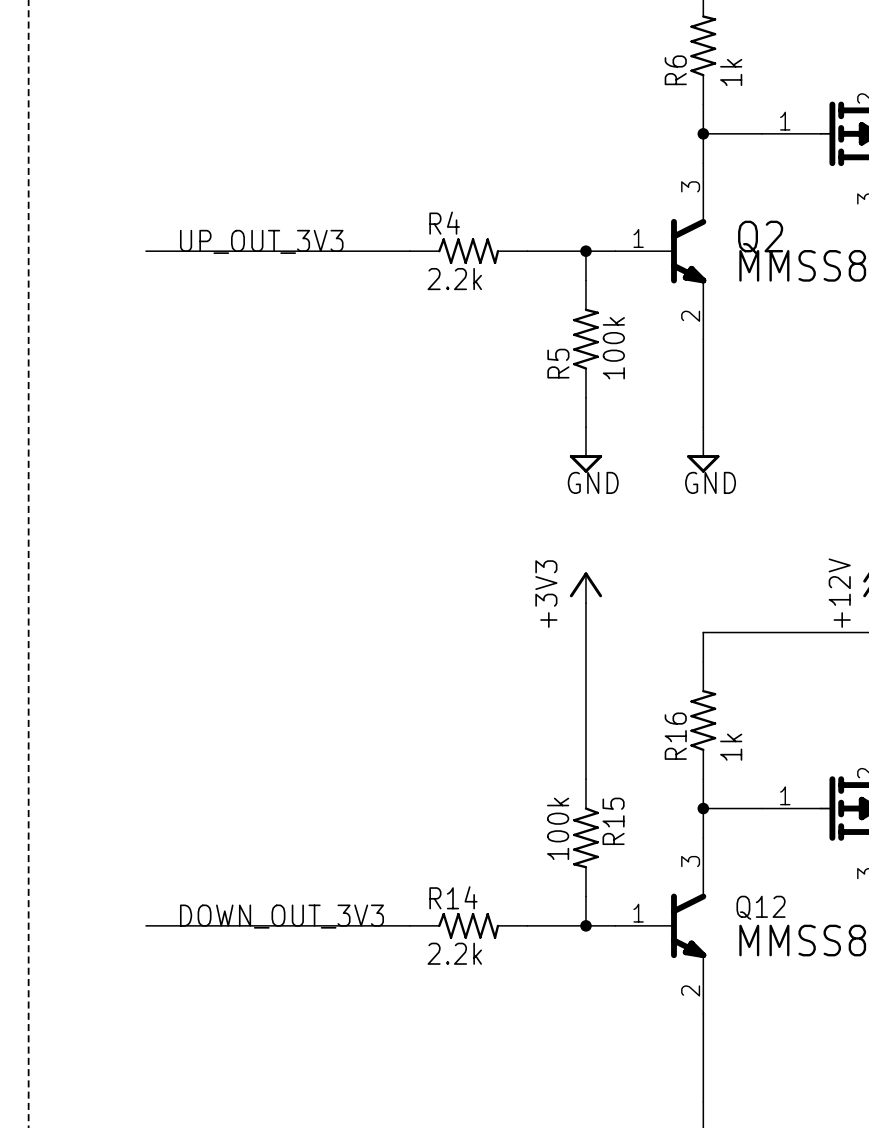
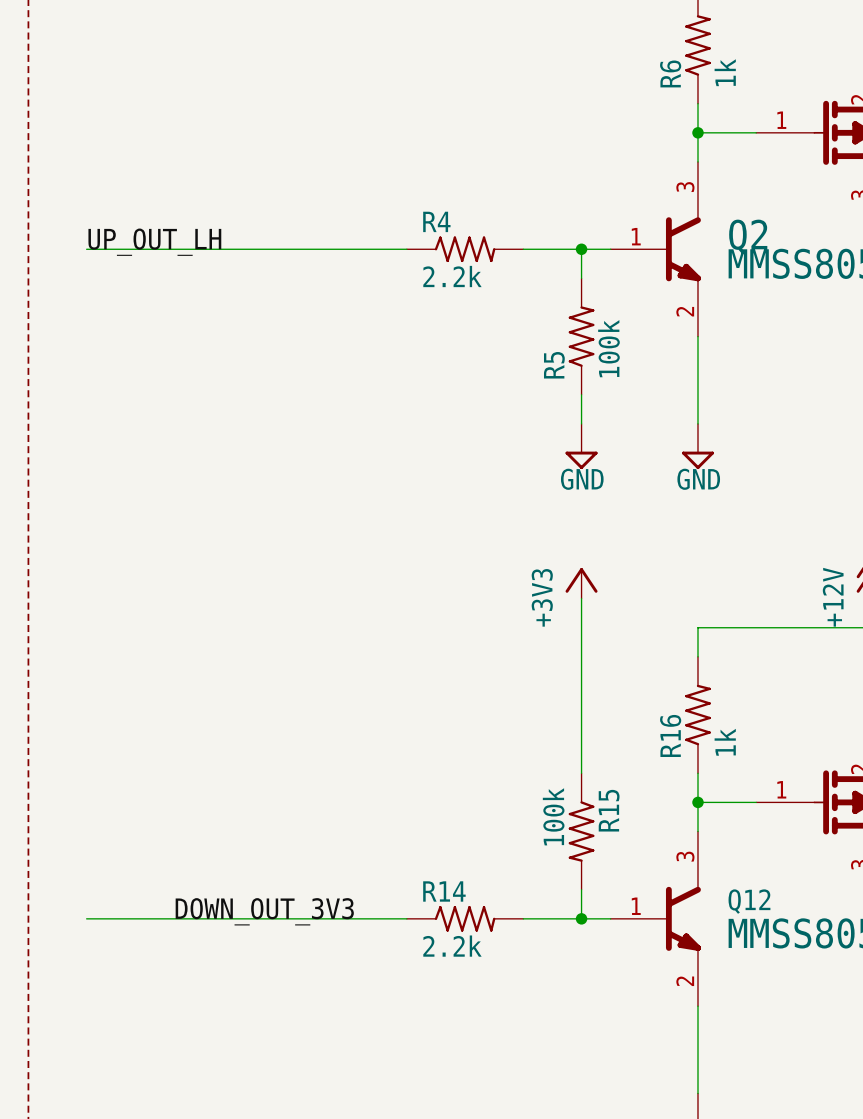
label: UP_OUT_3V3 (261, 241) -> UP_OUT_LH (154, 242)
wire: none -> (86, 249) (144, 249)
wire: none -> (86, 918) (144, 918)

